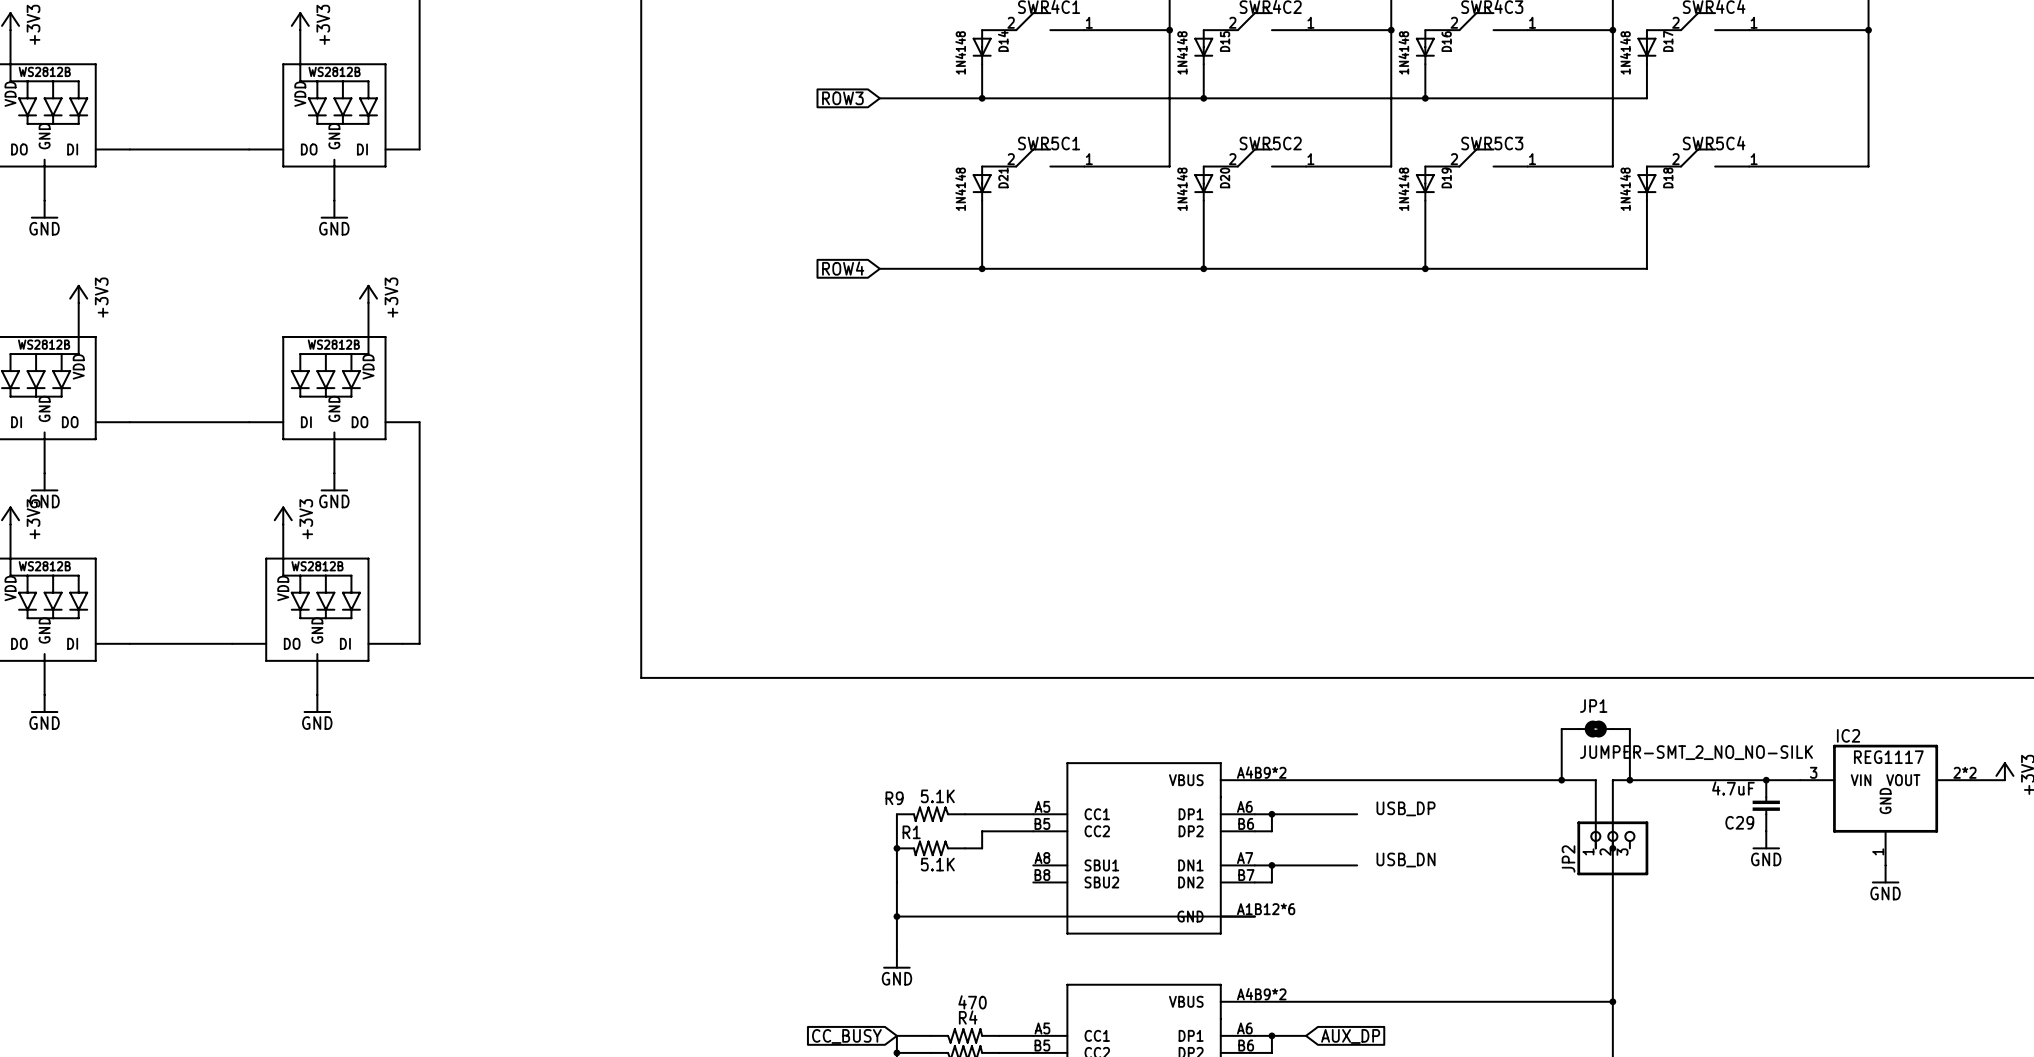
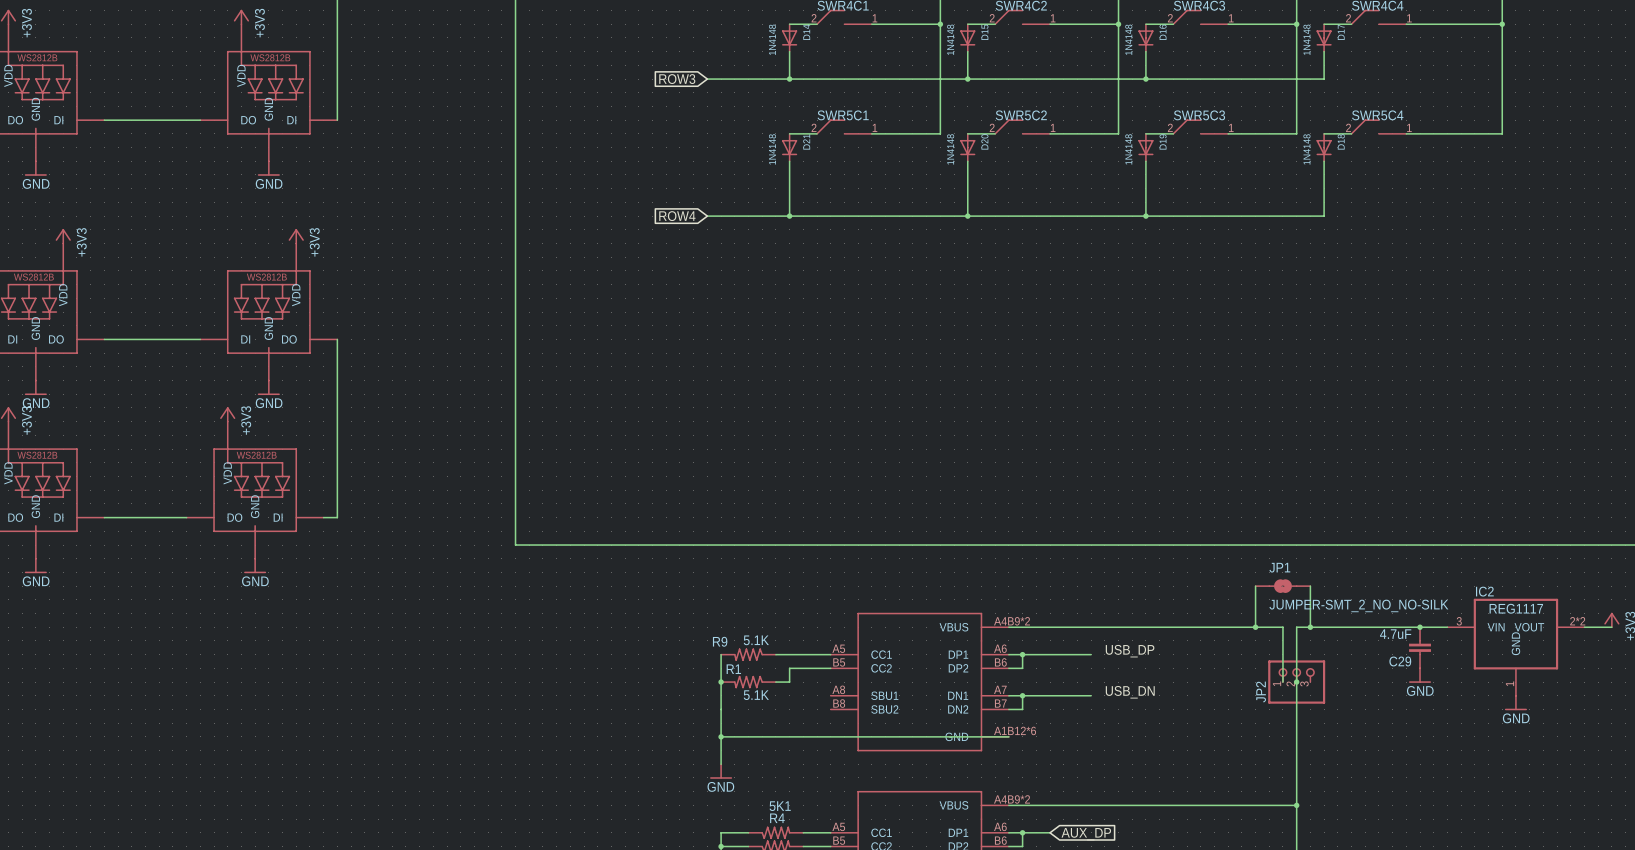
R4 value: 470 (972, 1002) -> 5K1 (780, 806)
global label: CC_BUSY (846, 1036) -> none

